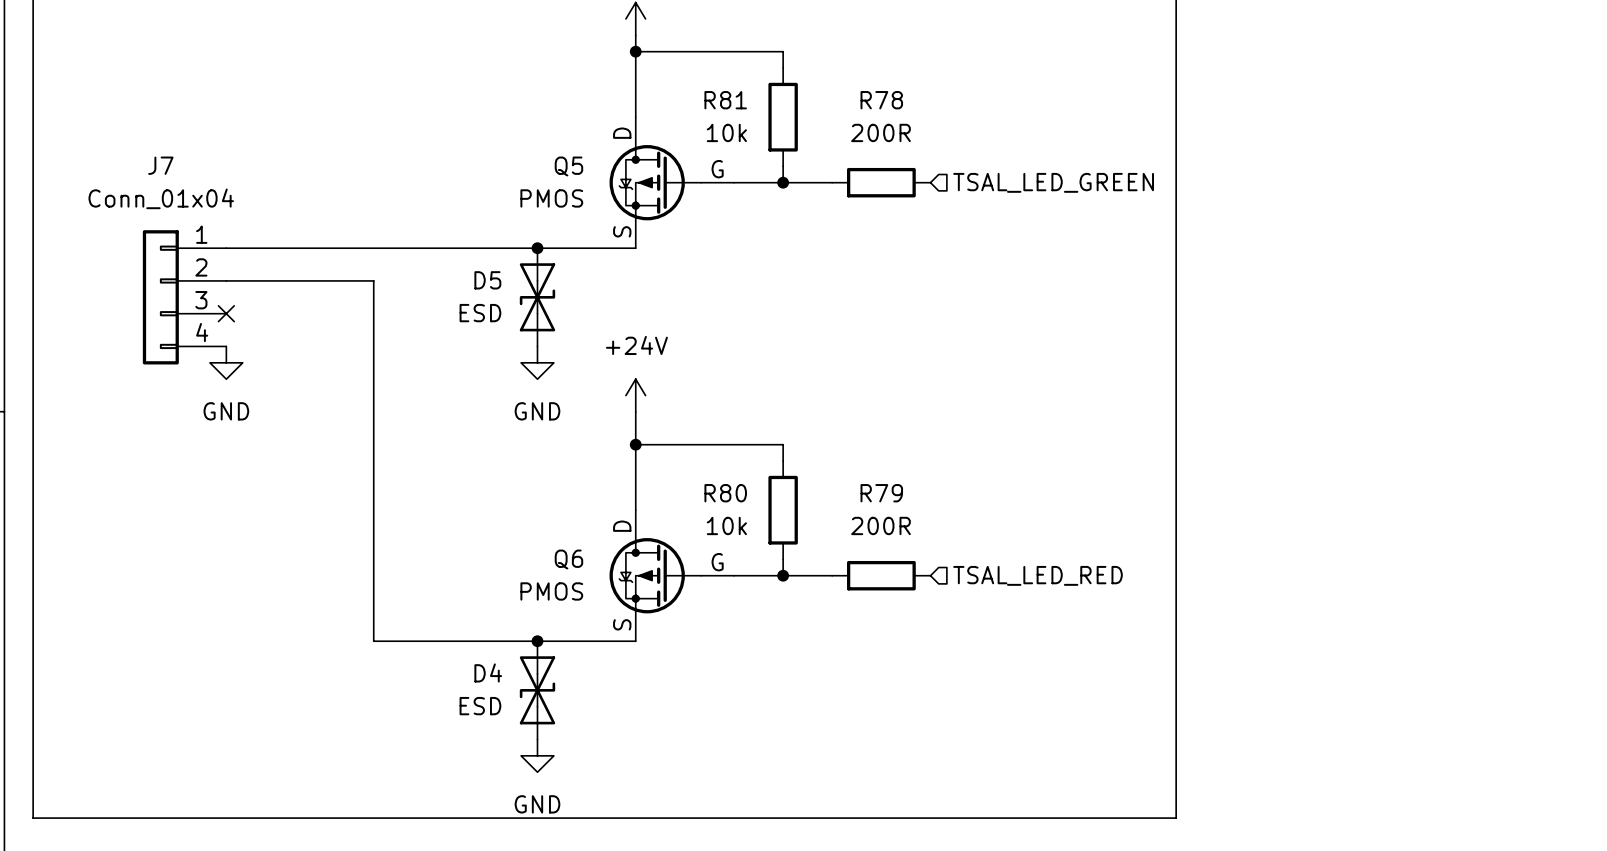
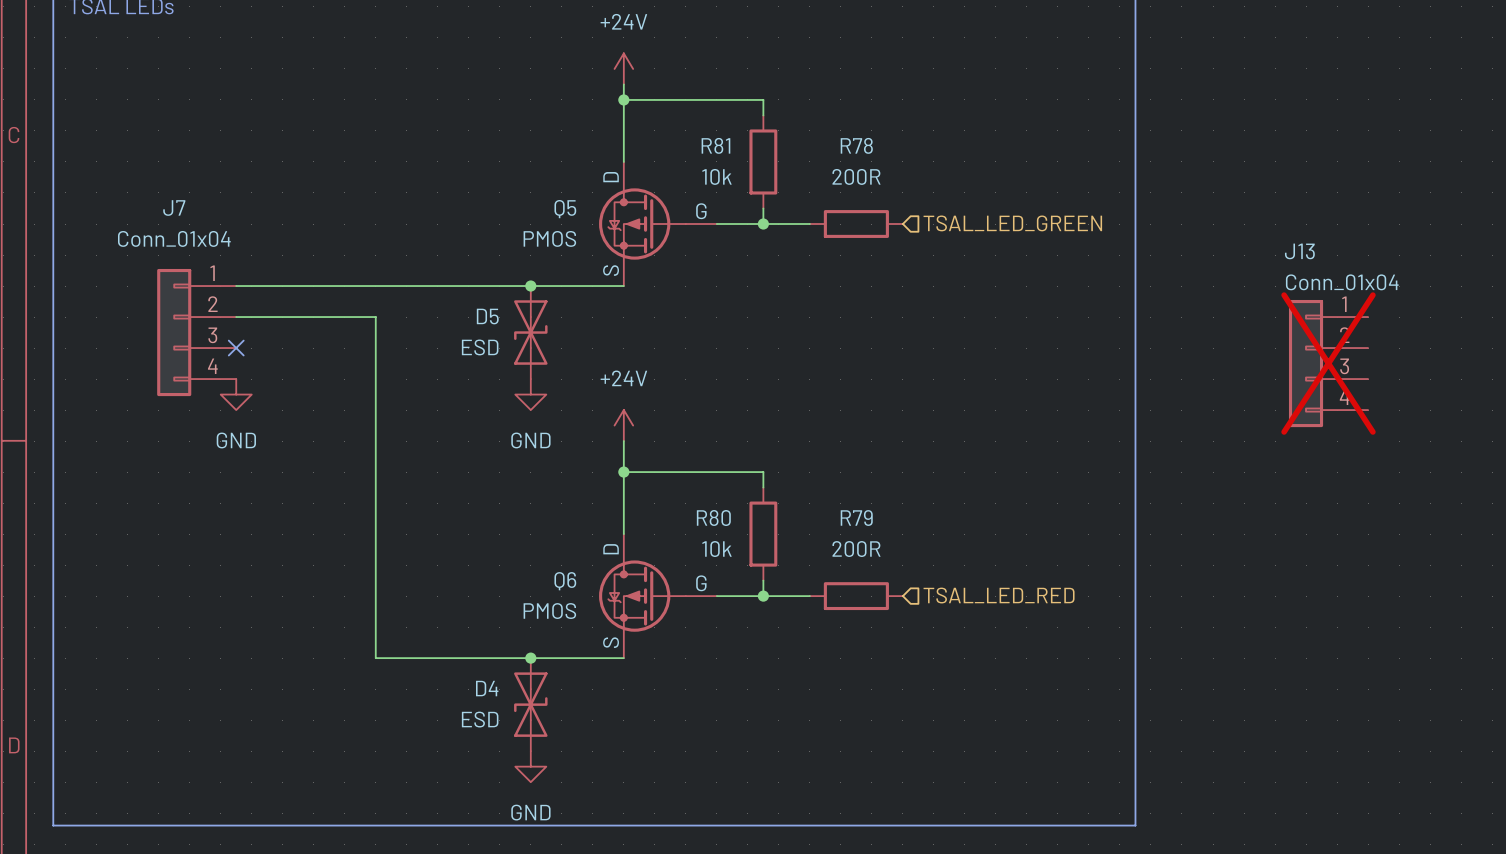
J13: none -> Conn_01x04 (1328, 363)

